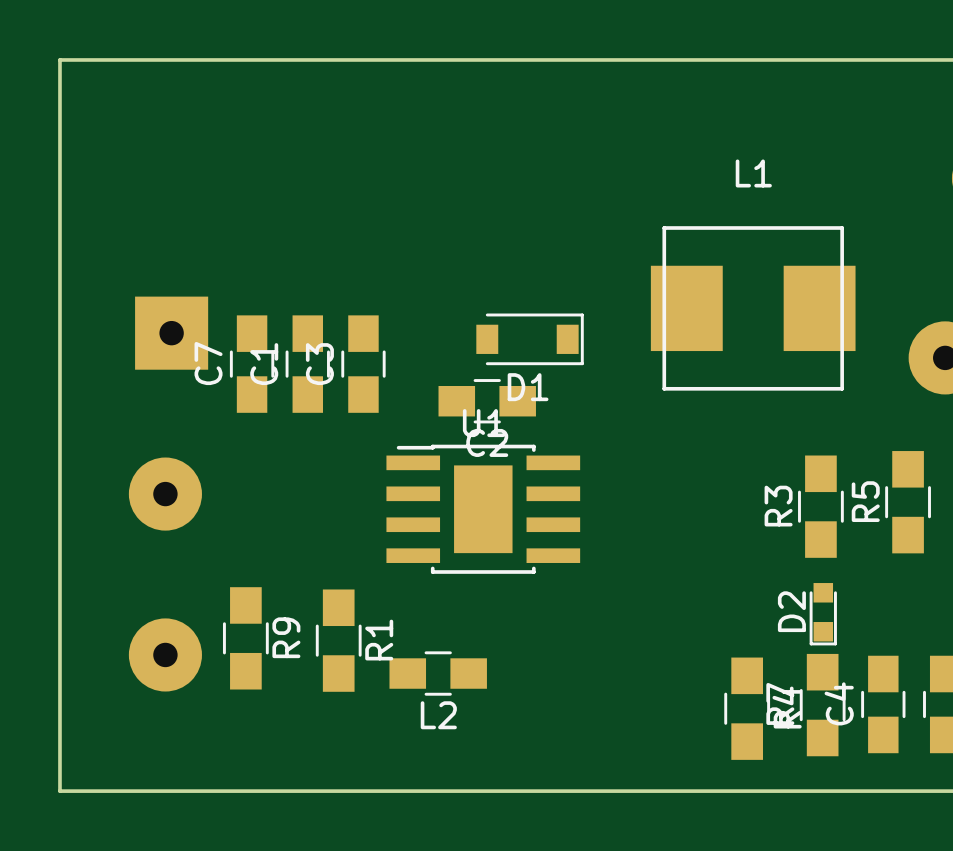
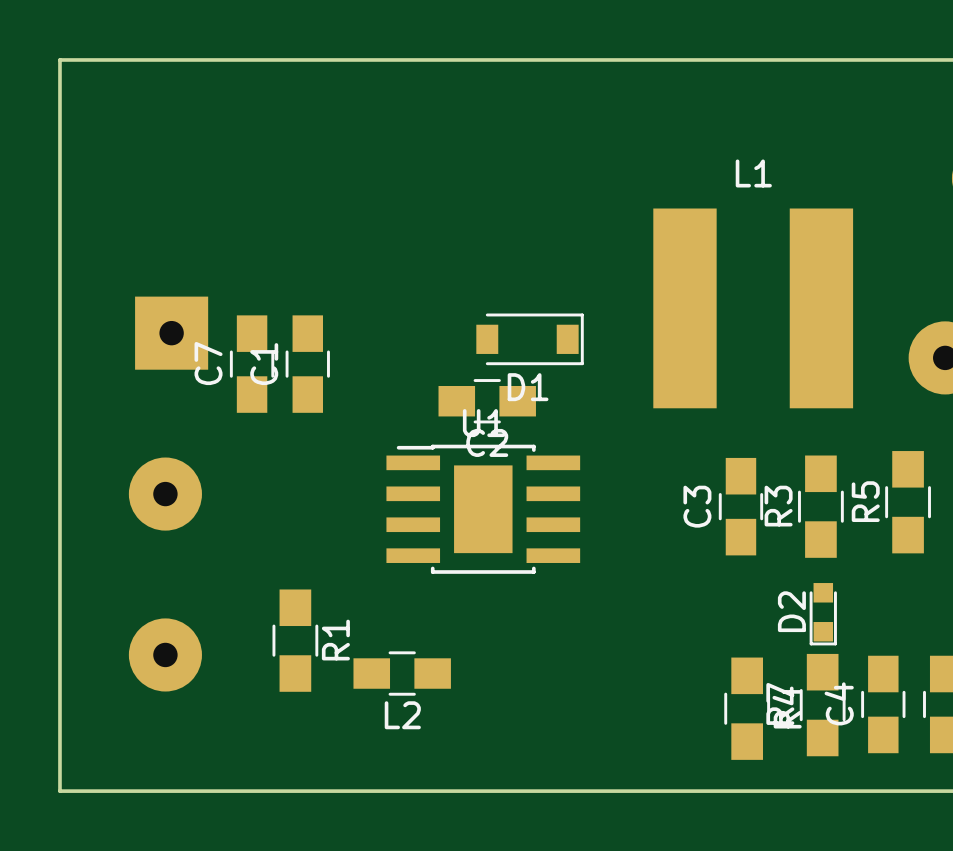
L1 footprint: [650, 226, 856, 391] -> [653, 208, 854, 409]
C3 position: (363, 364) -> (740, 506)
R9: (245, 638) -> none
R1 position: (338, 640) -> (295, 640)
L2 position: (438, 673) -> (402, 673)

